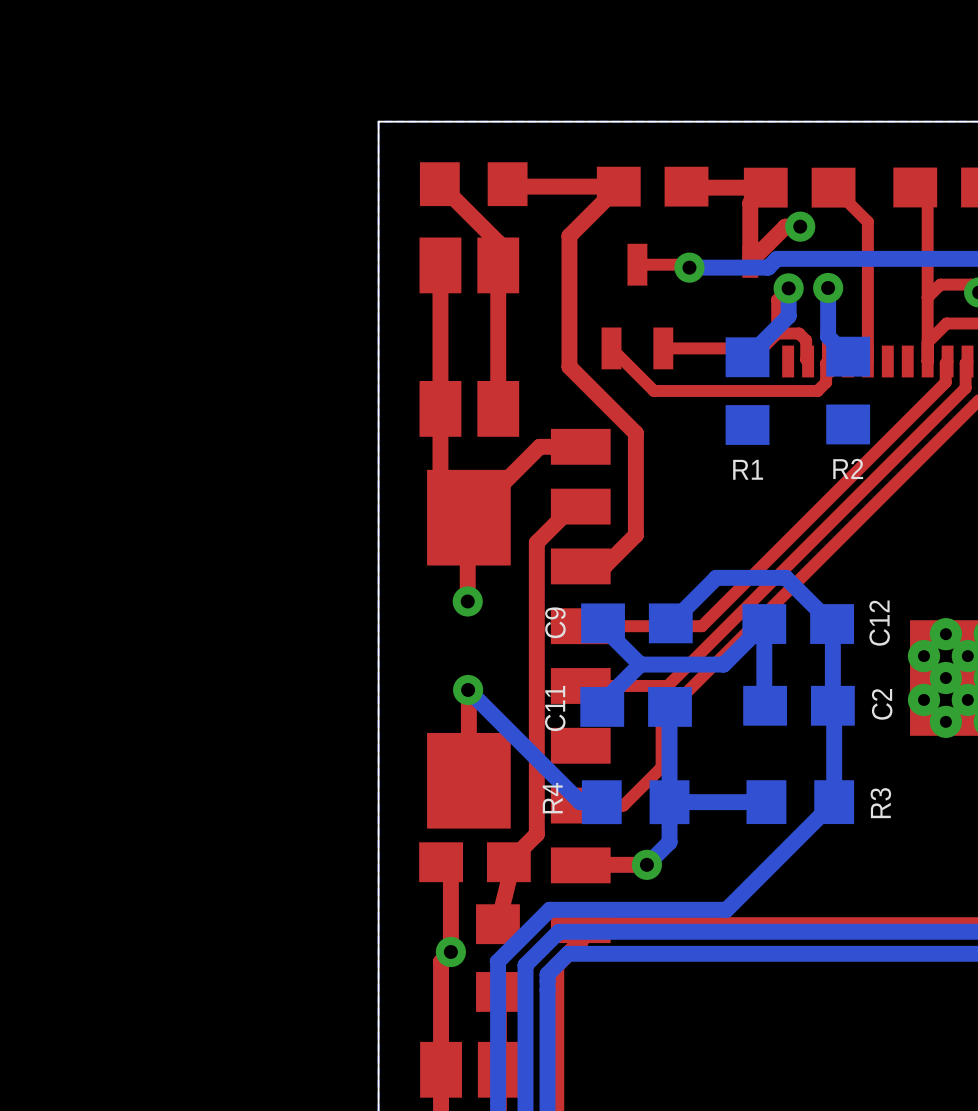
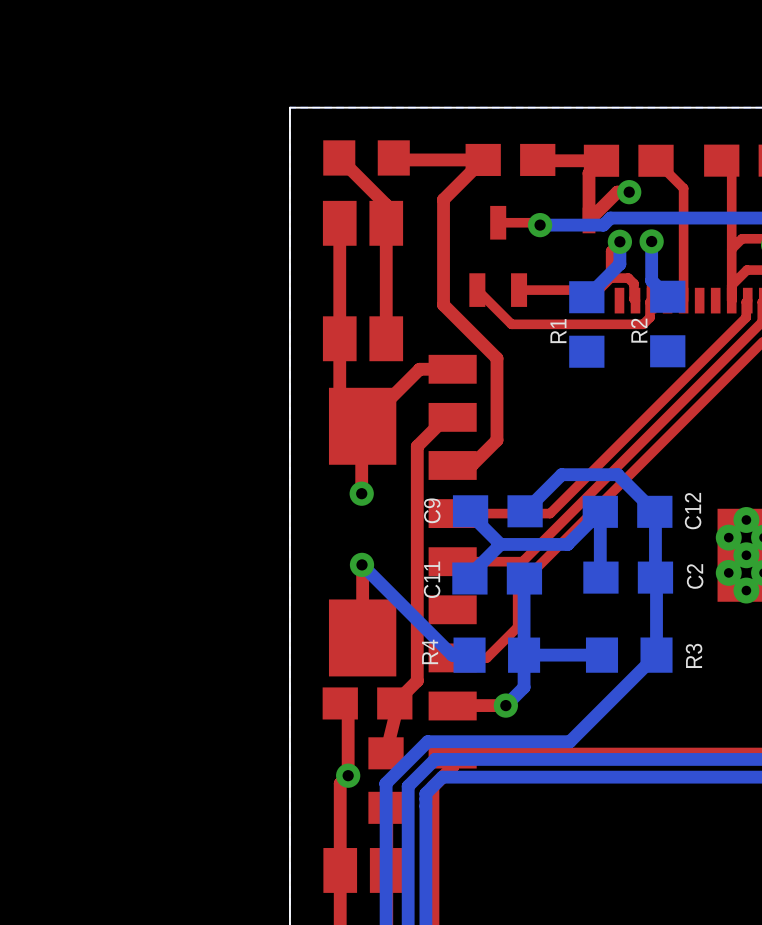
R2 name rotation: 0° (848, 468) -> 90° counterclockwise (639, 330)
R2 name position: R2 (848, 468) -> R2 (639, 330)
R1 name rotation: 0° (748, 469) -> 90° counterclockwise (558, 331)
R1 name position: R1 (748, 469) -> R1 (558, 331)

